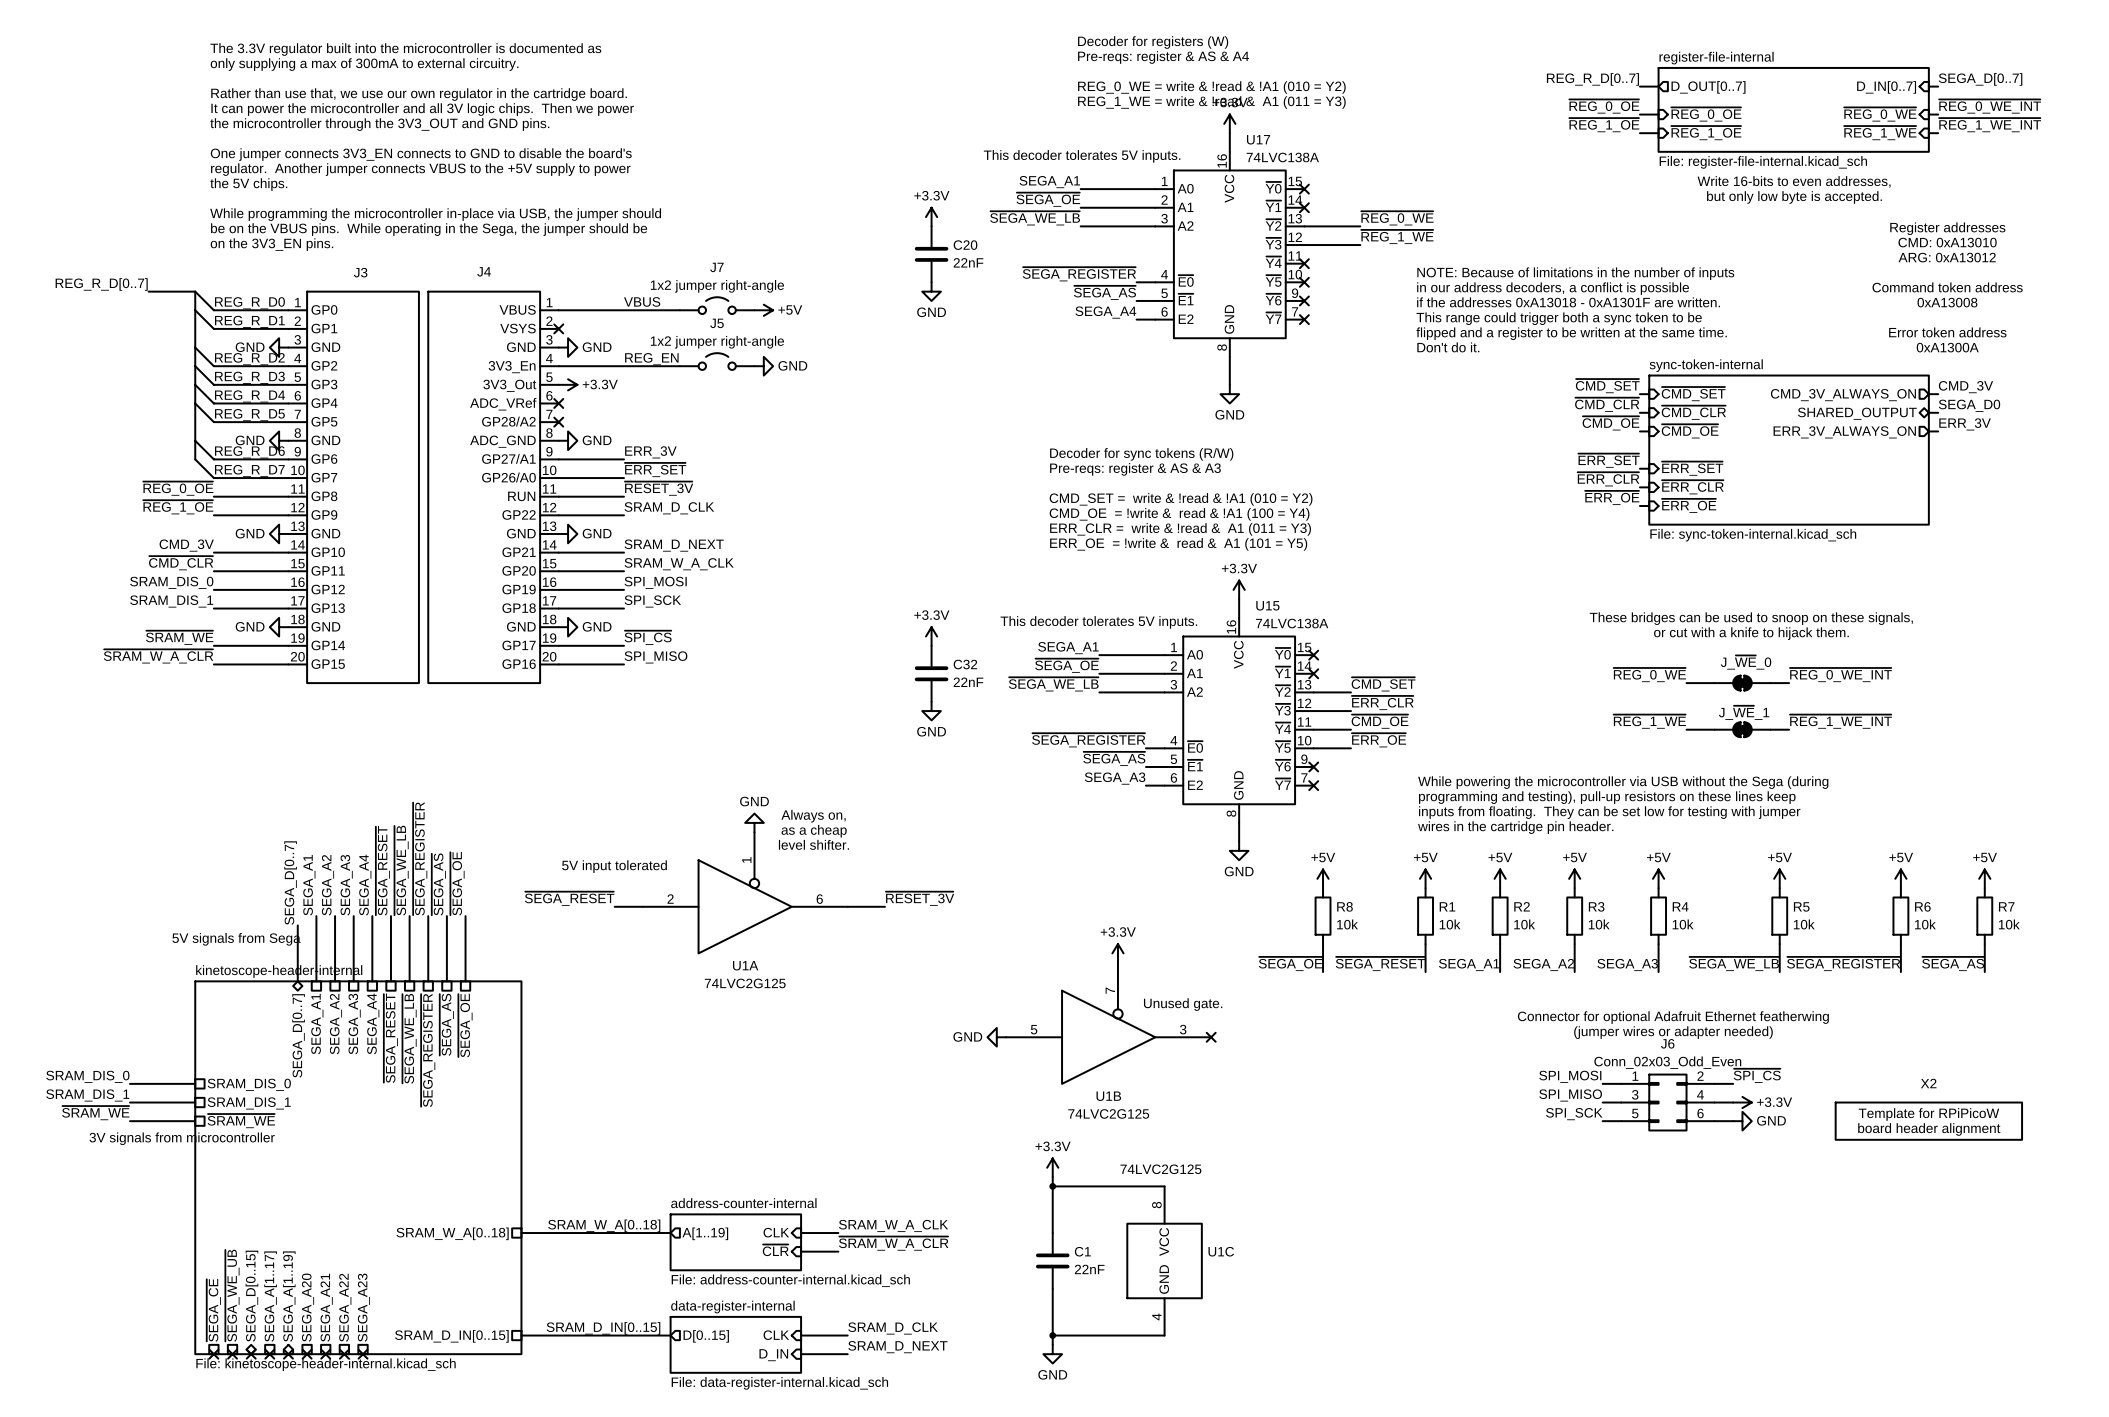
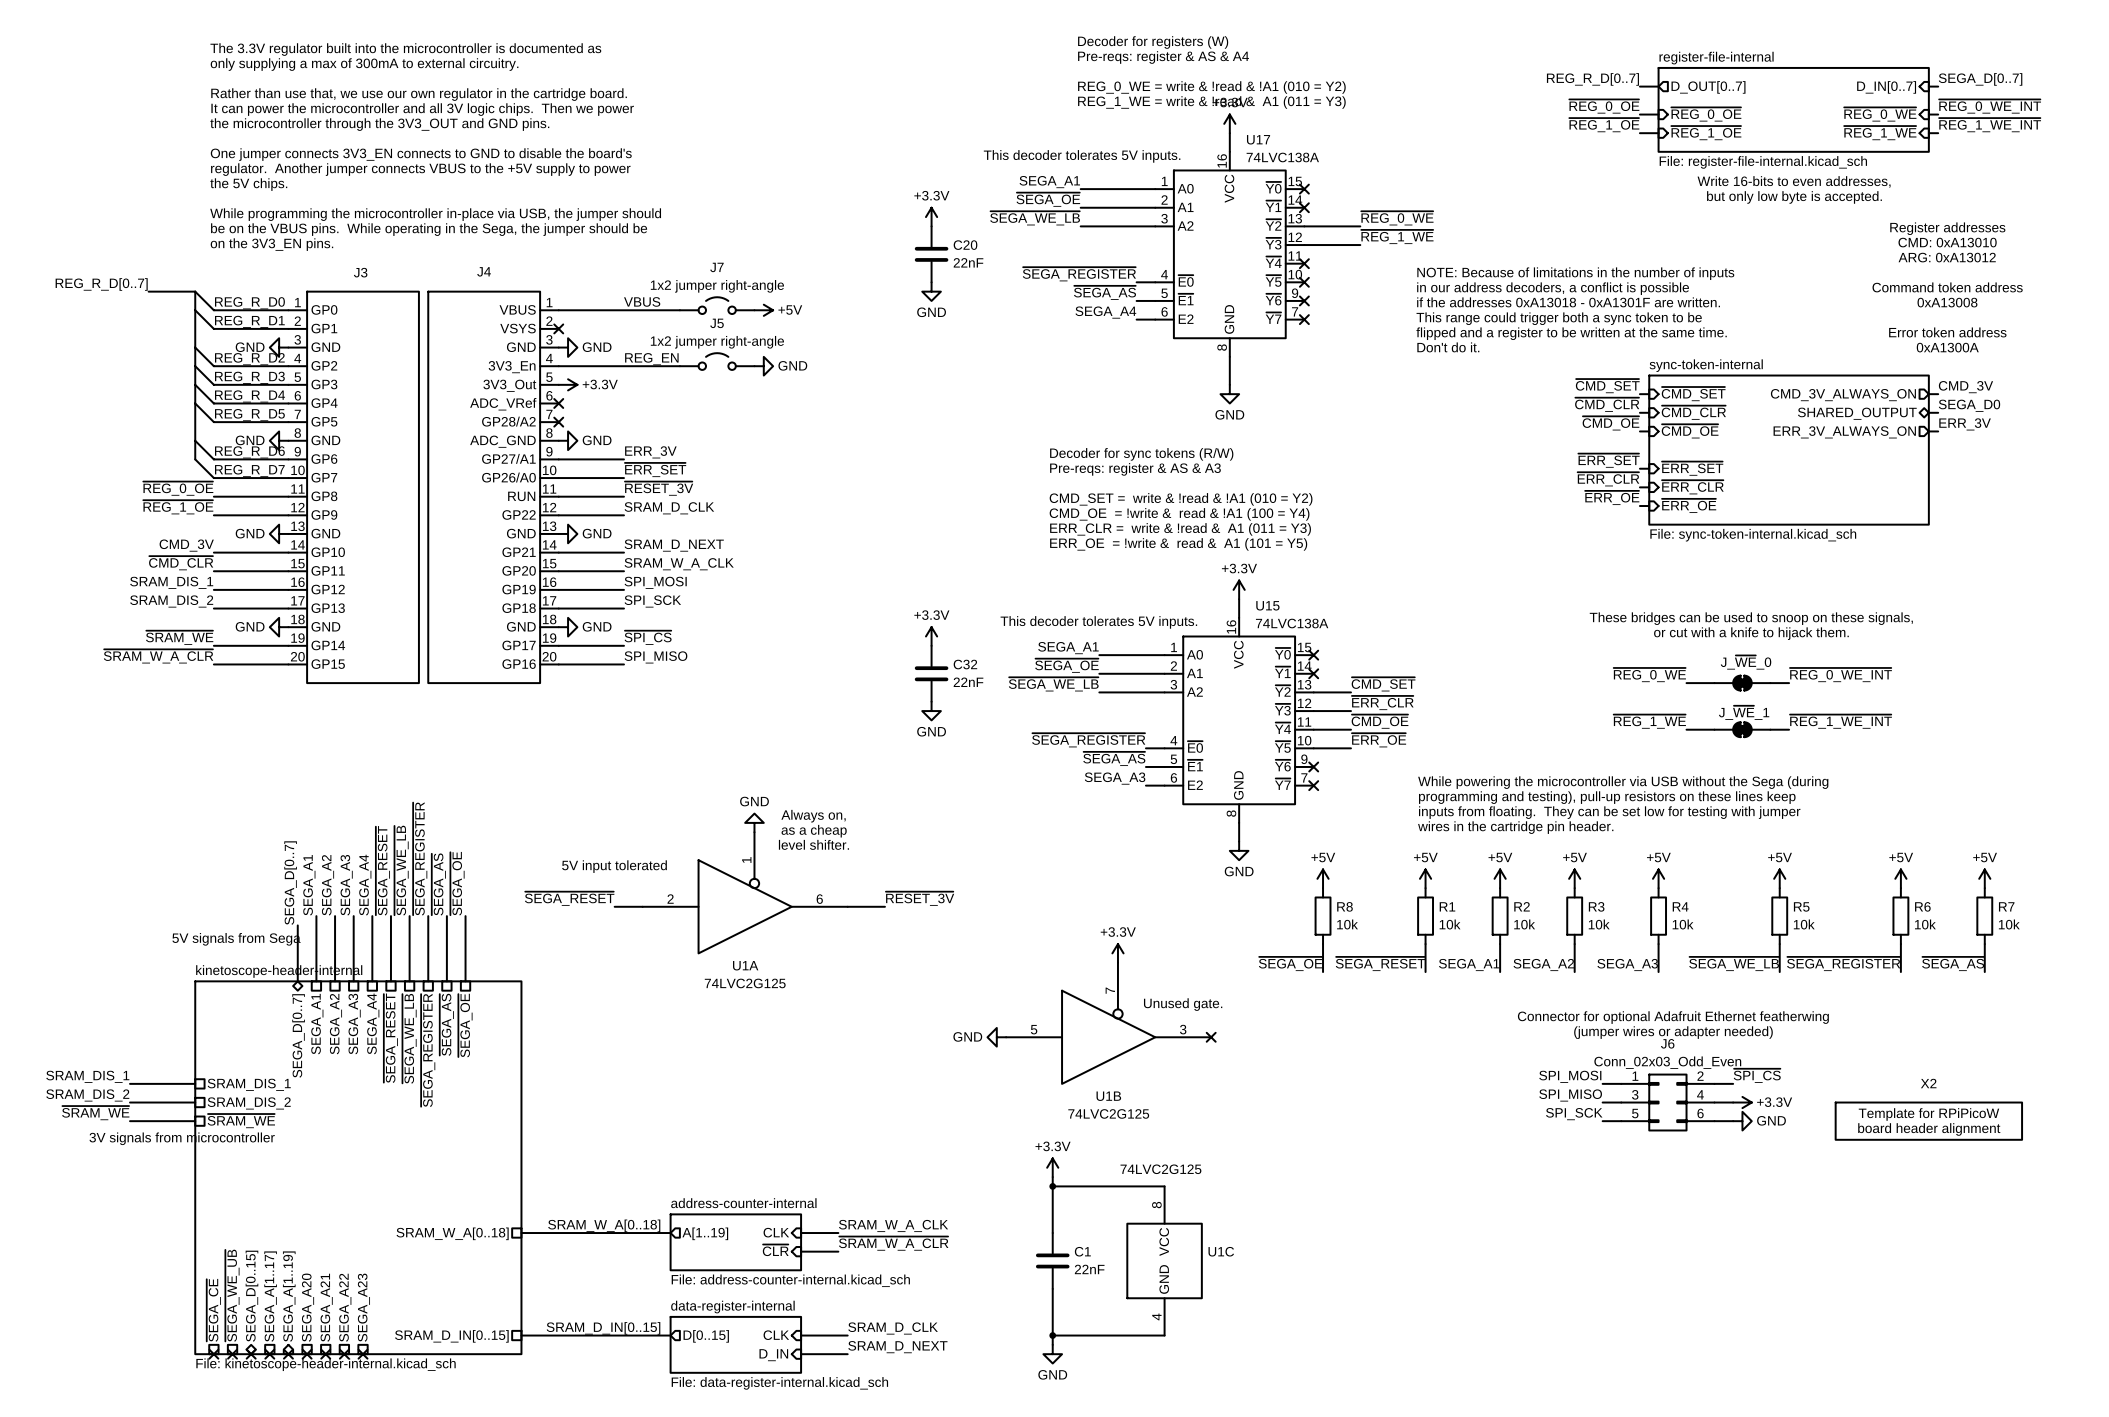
label: SRAM_DIS_0 (171, 582) -> SRAM_DIS_1 (171, 582)
label: SRAM_DIS_1 (171, 601) -> SRAM_DIS_2 (171, 601)
label: SRAM_DIS_0 (87, 1076) -> SRAM_DIS_1 (87, 1076)
sheet pin: SRAM_DIS_0 (249, 1084) -> SRAM_DIS_1 (249, 1084)
label: SRAM_DIS_1 (87, 1095) -> SRAM_DIS_2 (87, 1095)
sheet pin: SRAM_DIS_1 (249, 1103) -> SRAM_DIS_2 (249, 1103)

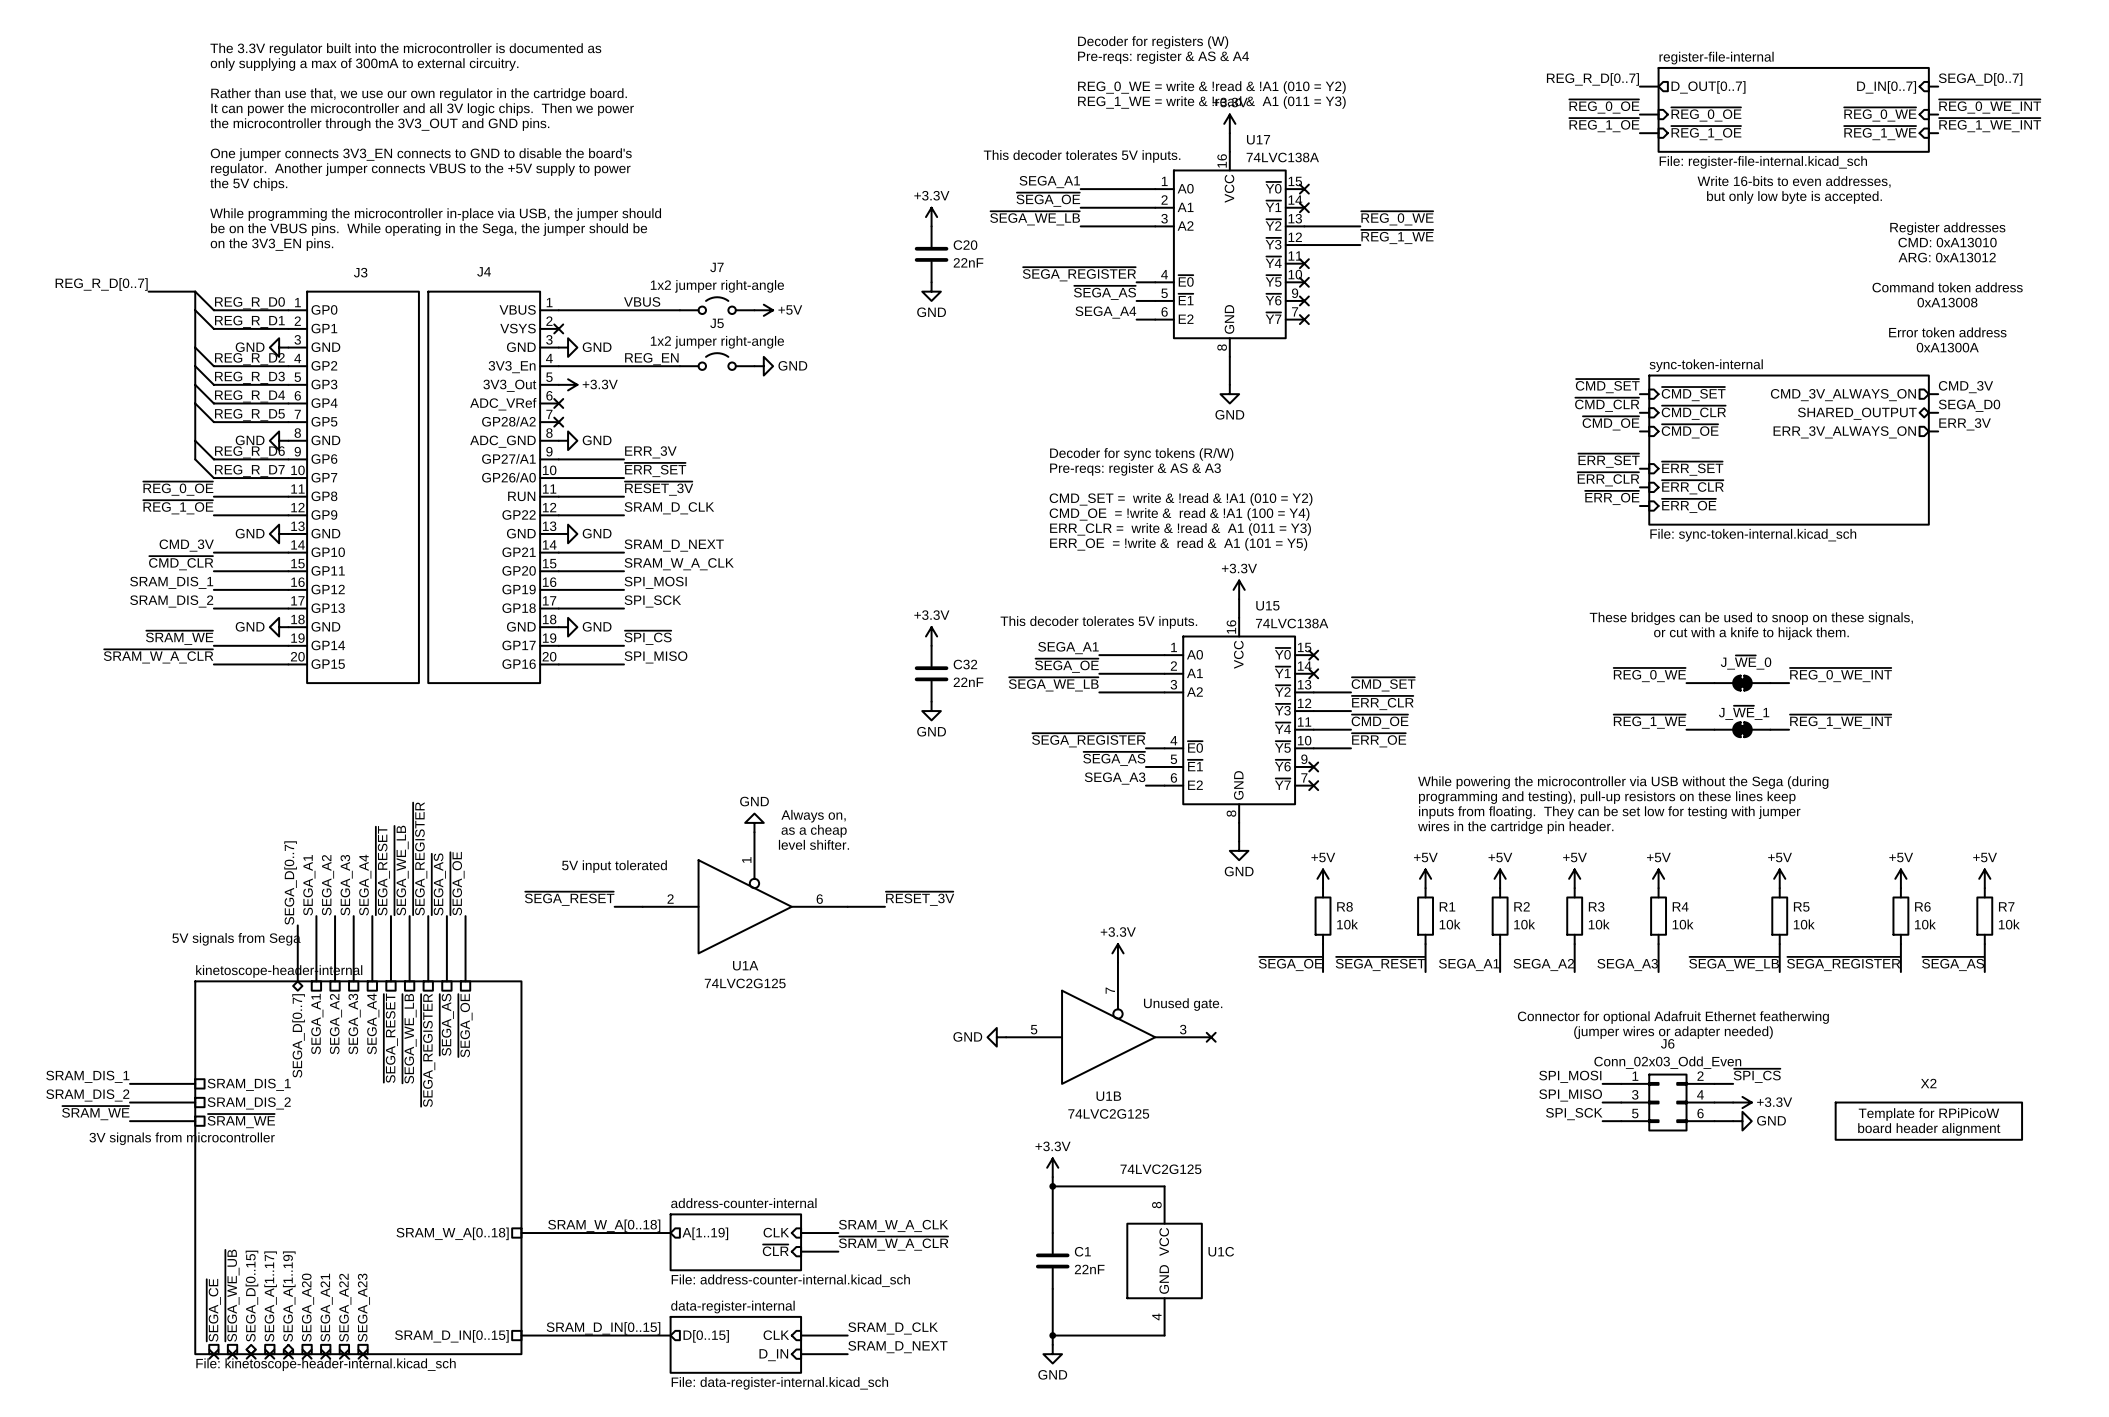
text: NOTE: Because of limitations in the number of inputs (1575, 273) -> none
text: in our address decoders, a conflict is possible (1553, 288) -> none
text: if the addresses 0xA13018 - 0xA1301F are written. (1568, 302) -> none
text: This range could trigger both a sync token to be (1559, 318) -> none
text: flipped and a register to be written at the same time. (1571, 333) -> none
text: Don't do it. (1448, 347) -> none

